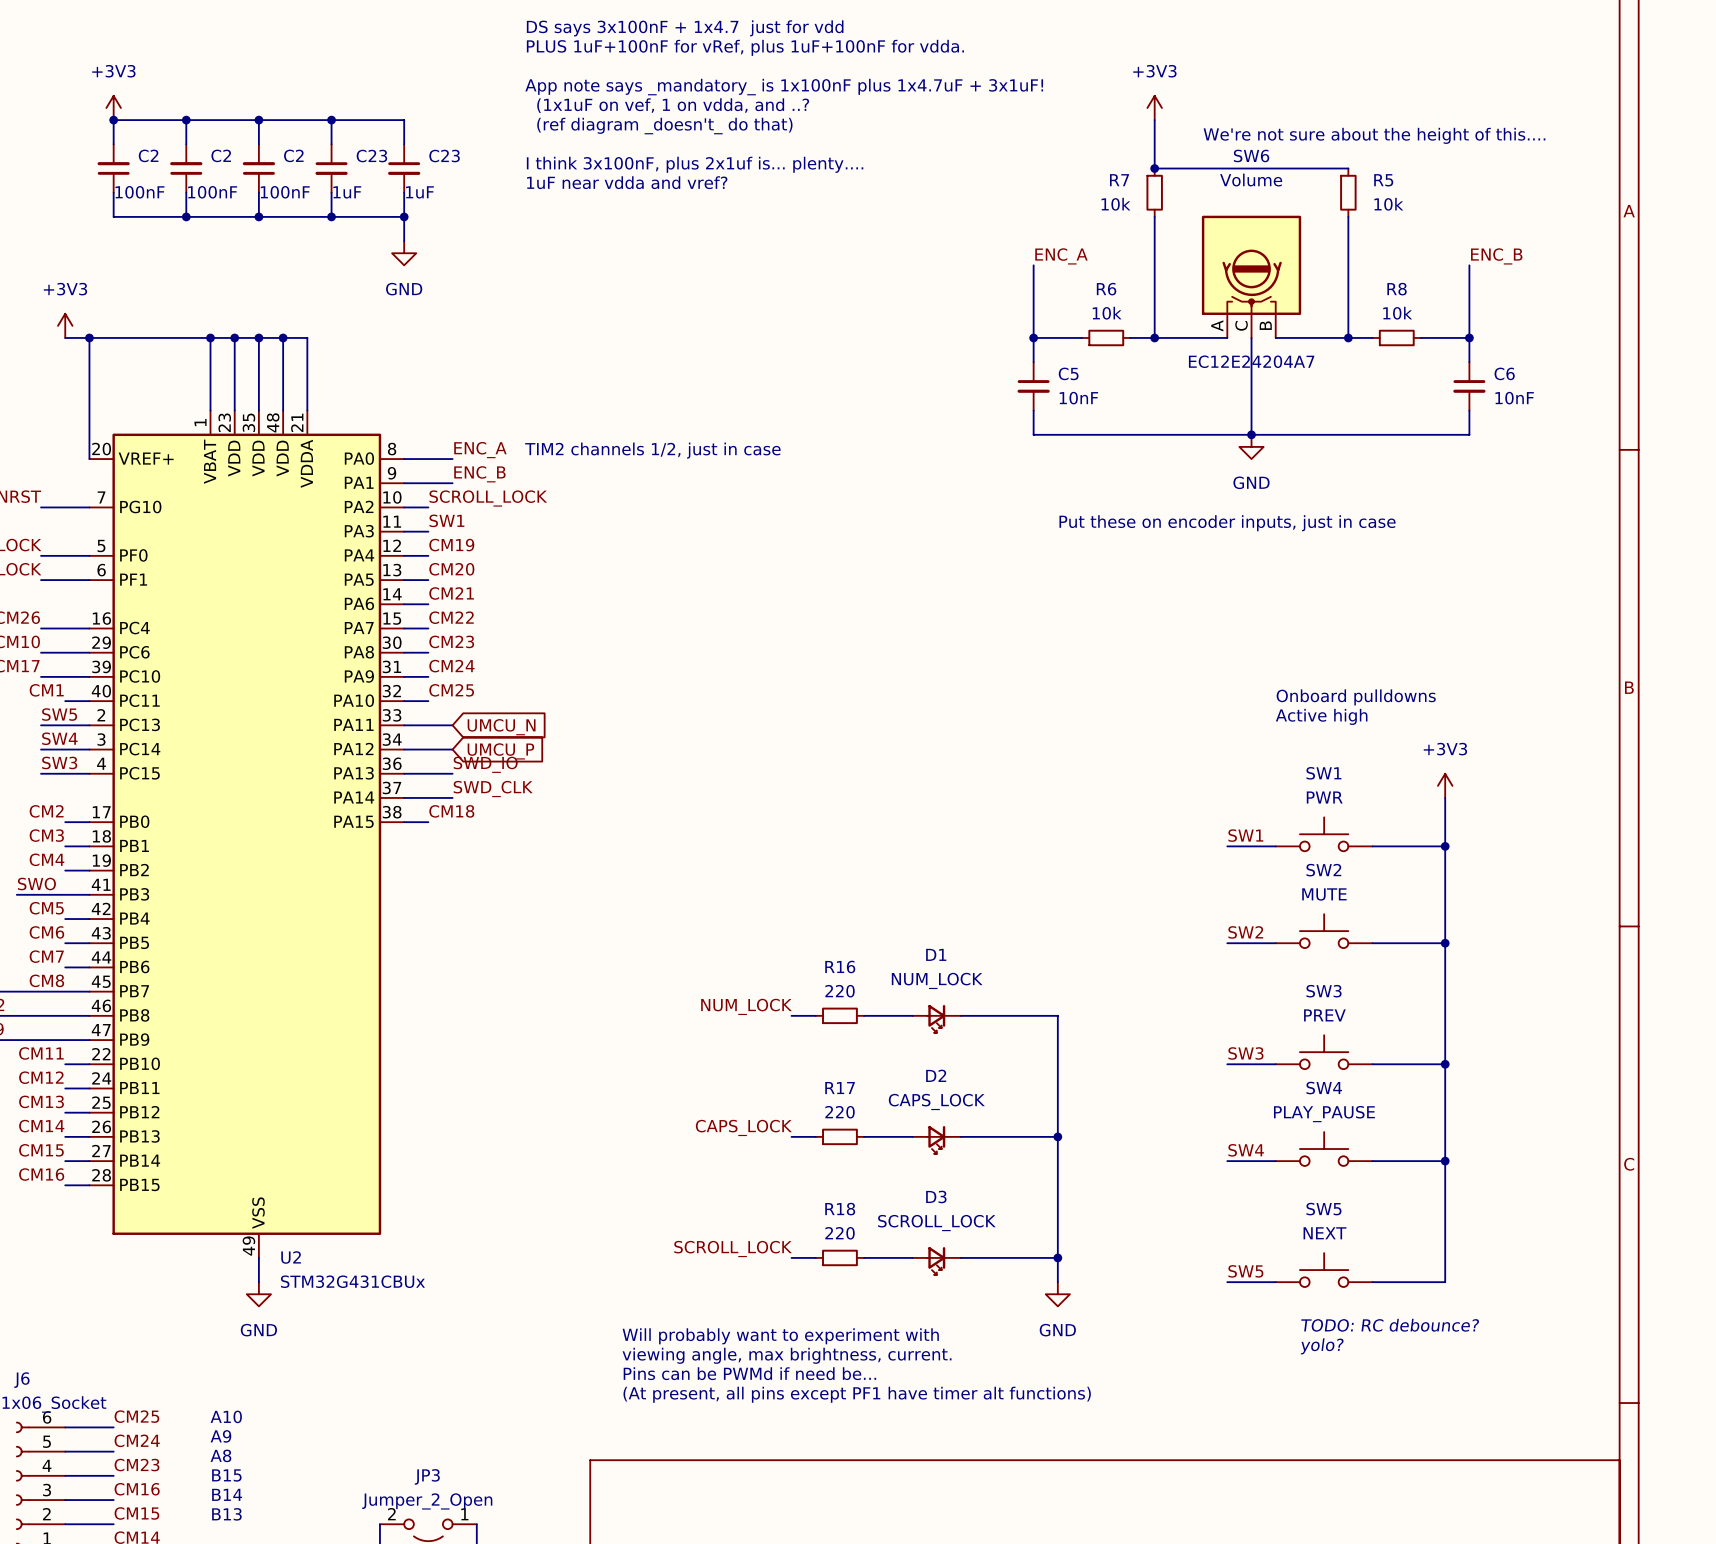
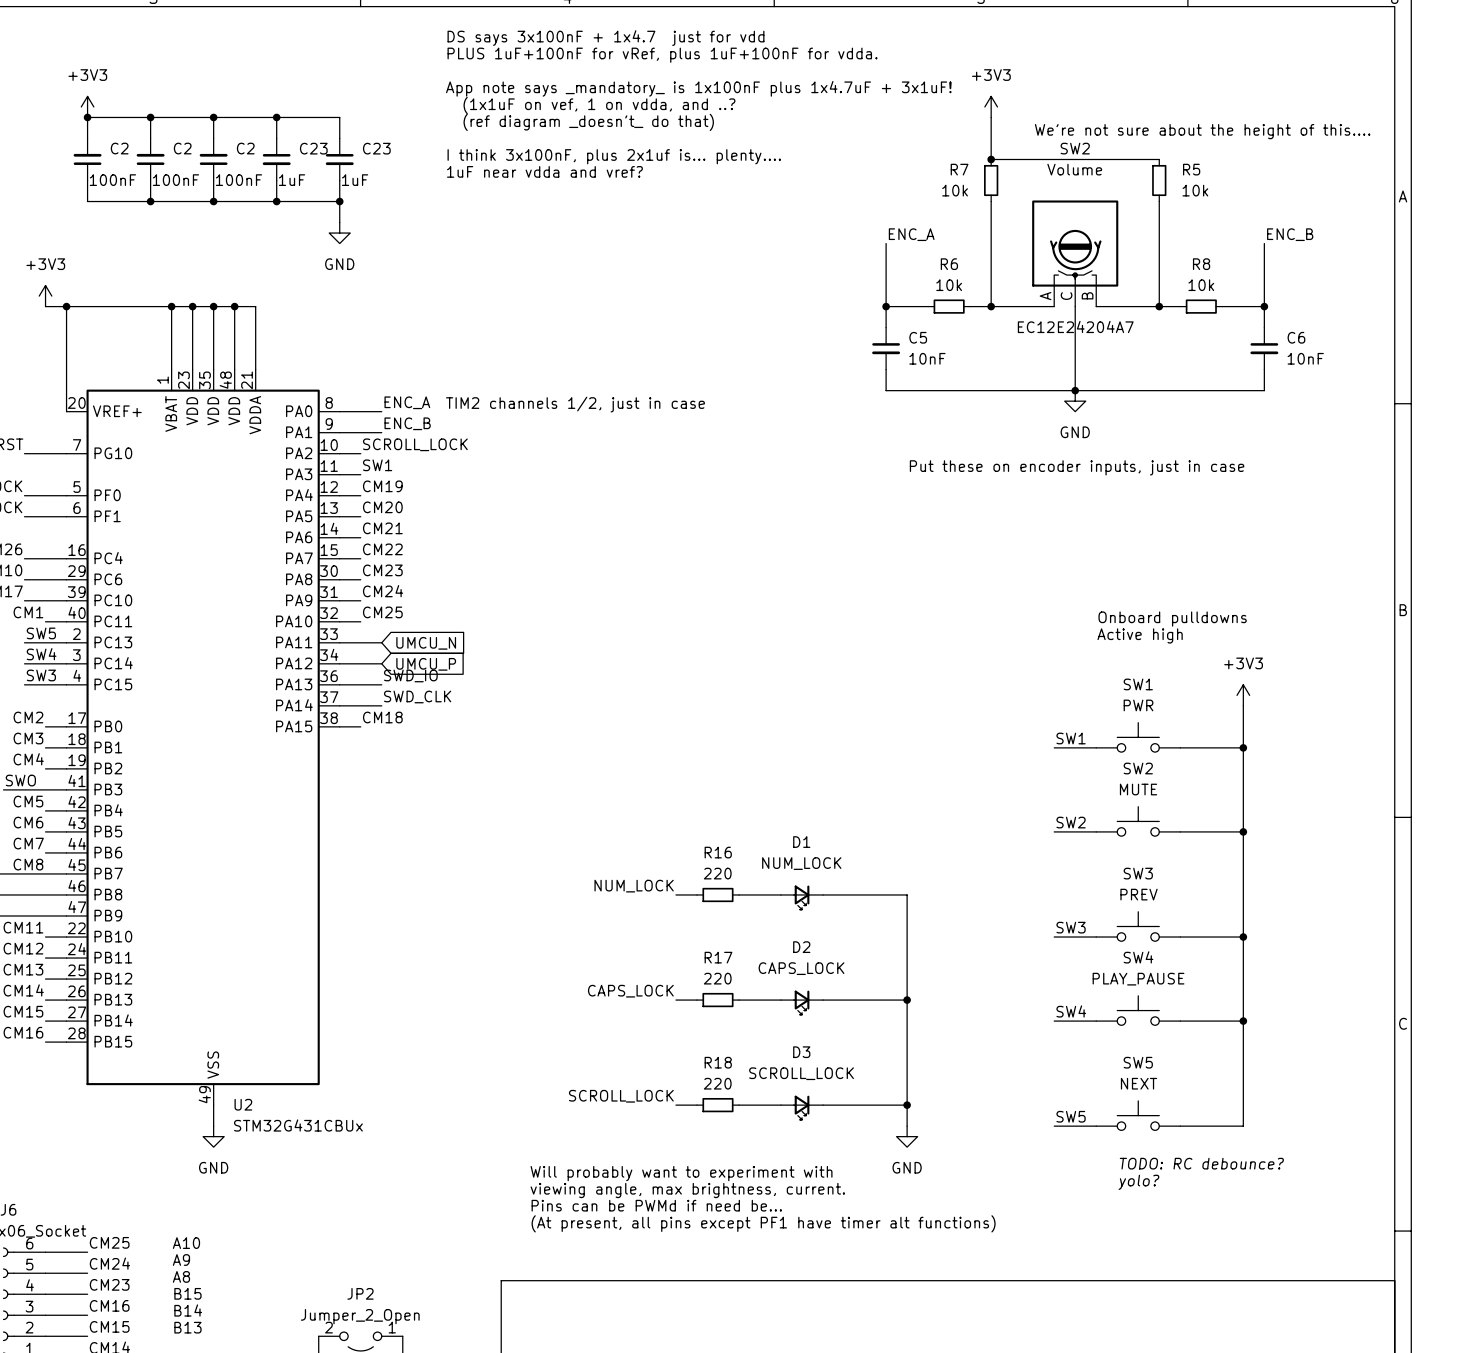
SW6 name: SW6 (1251, 155) -> SW2 (1075, 148)
JP3 name: JP3 (427, 1476) -> JP2 (360, 1293)

